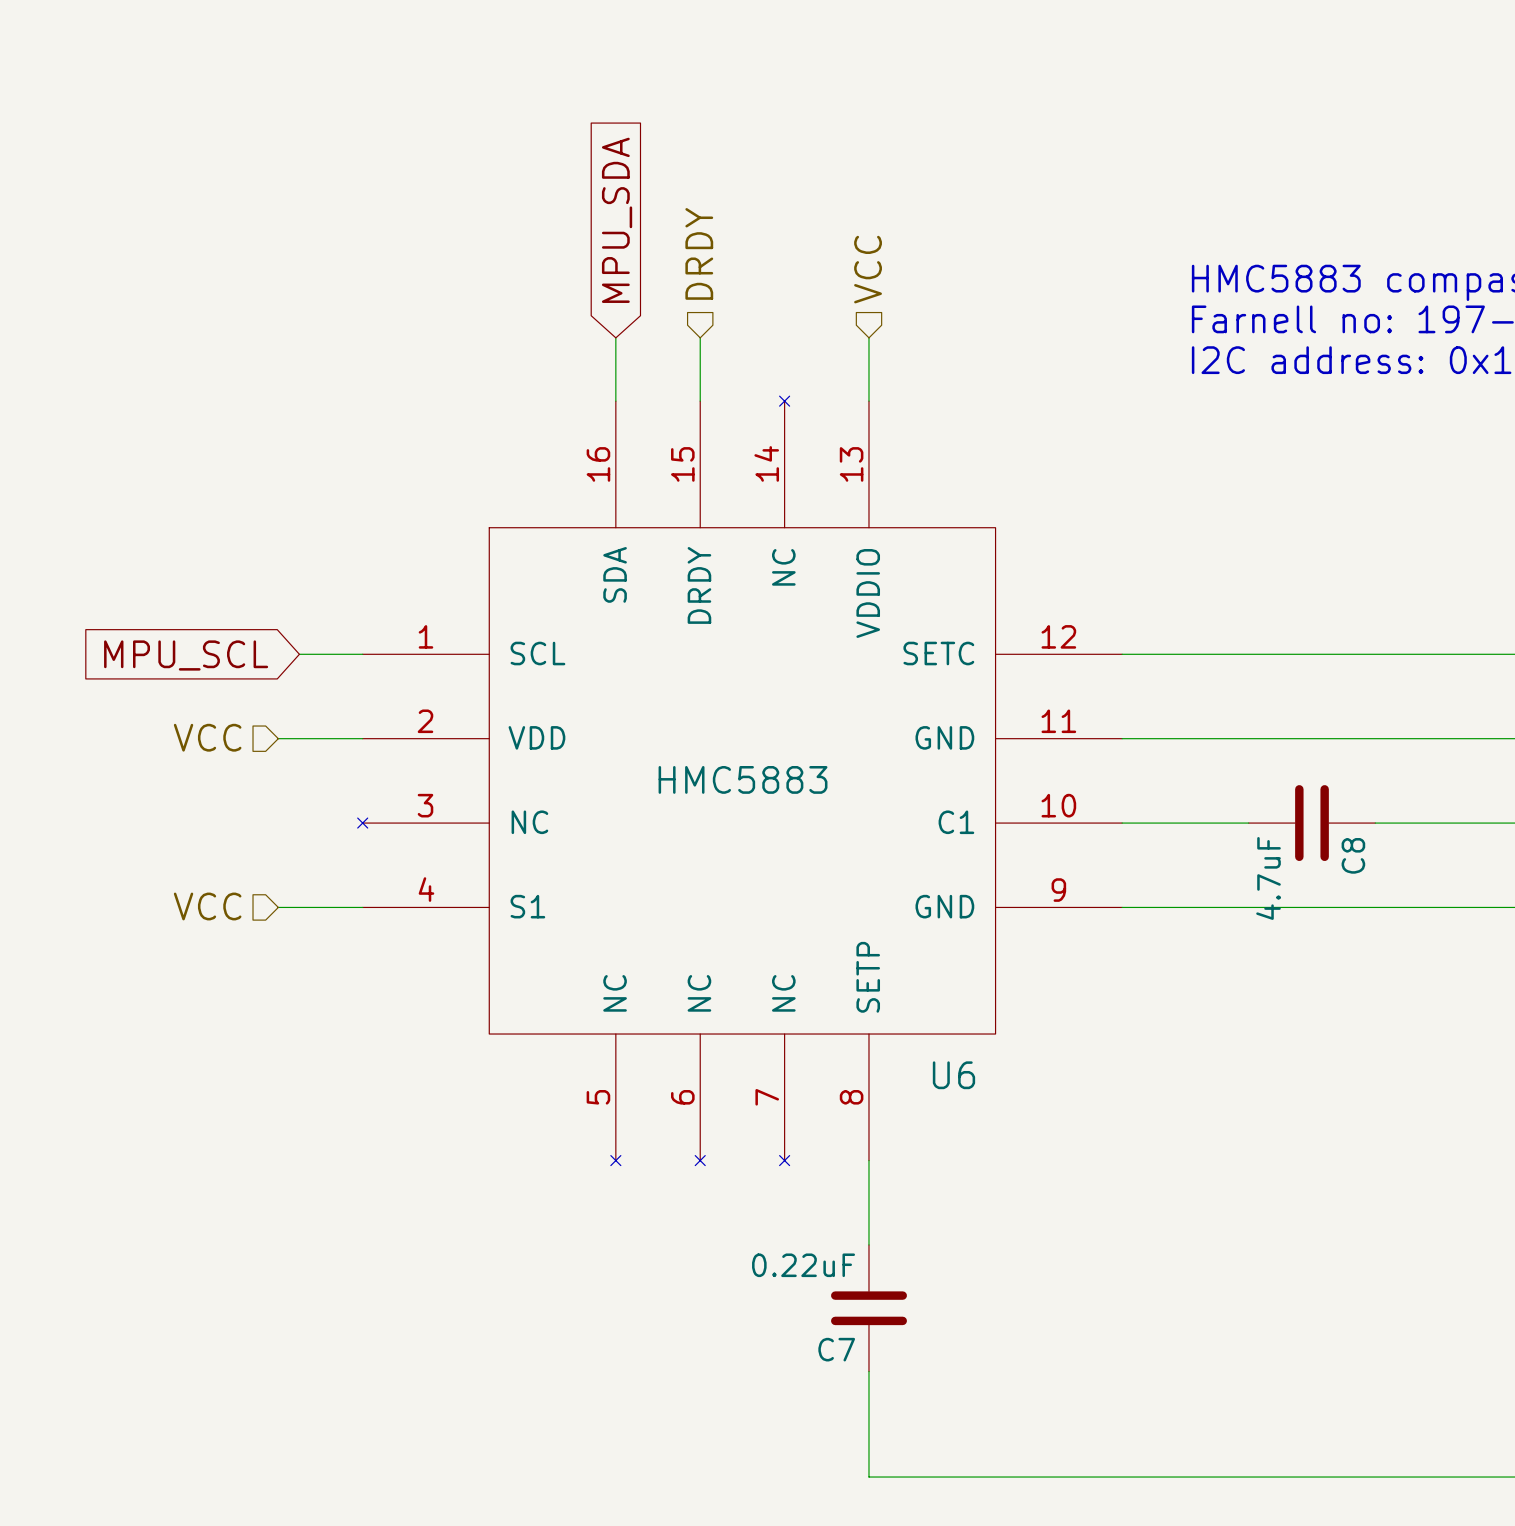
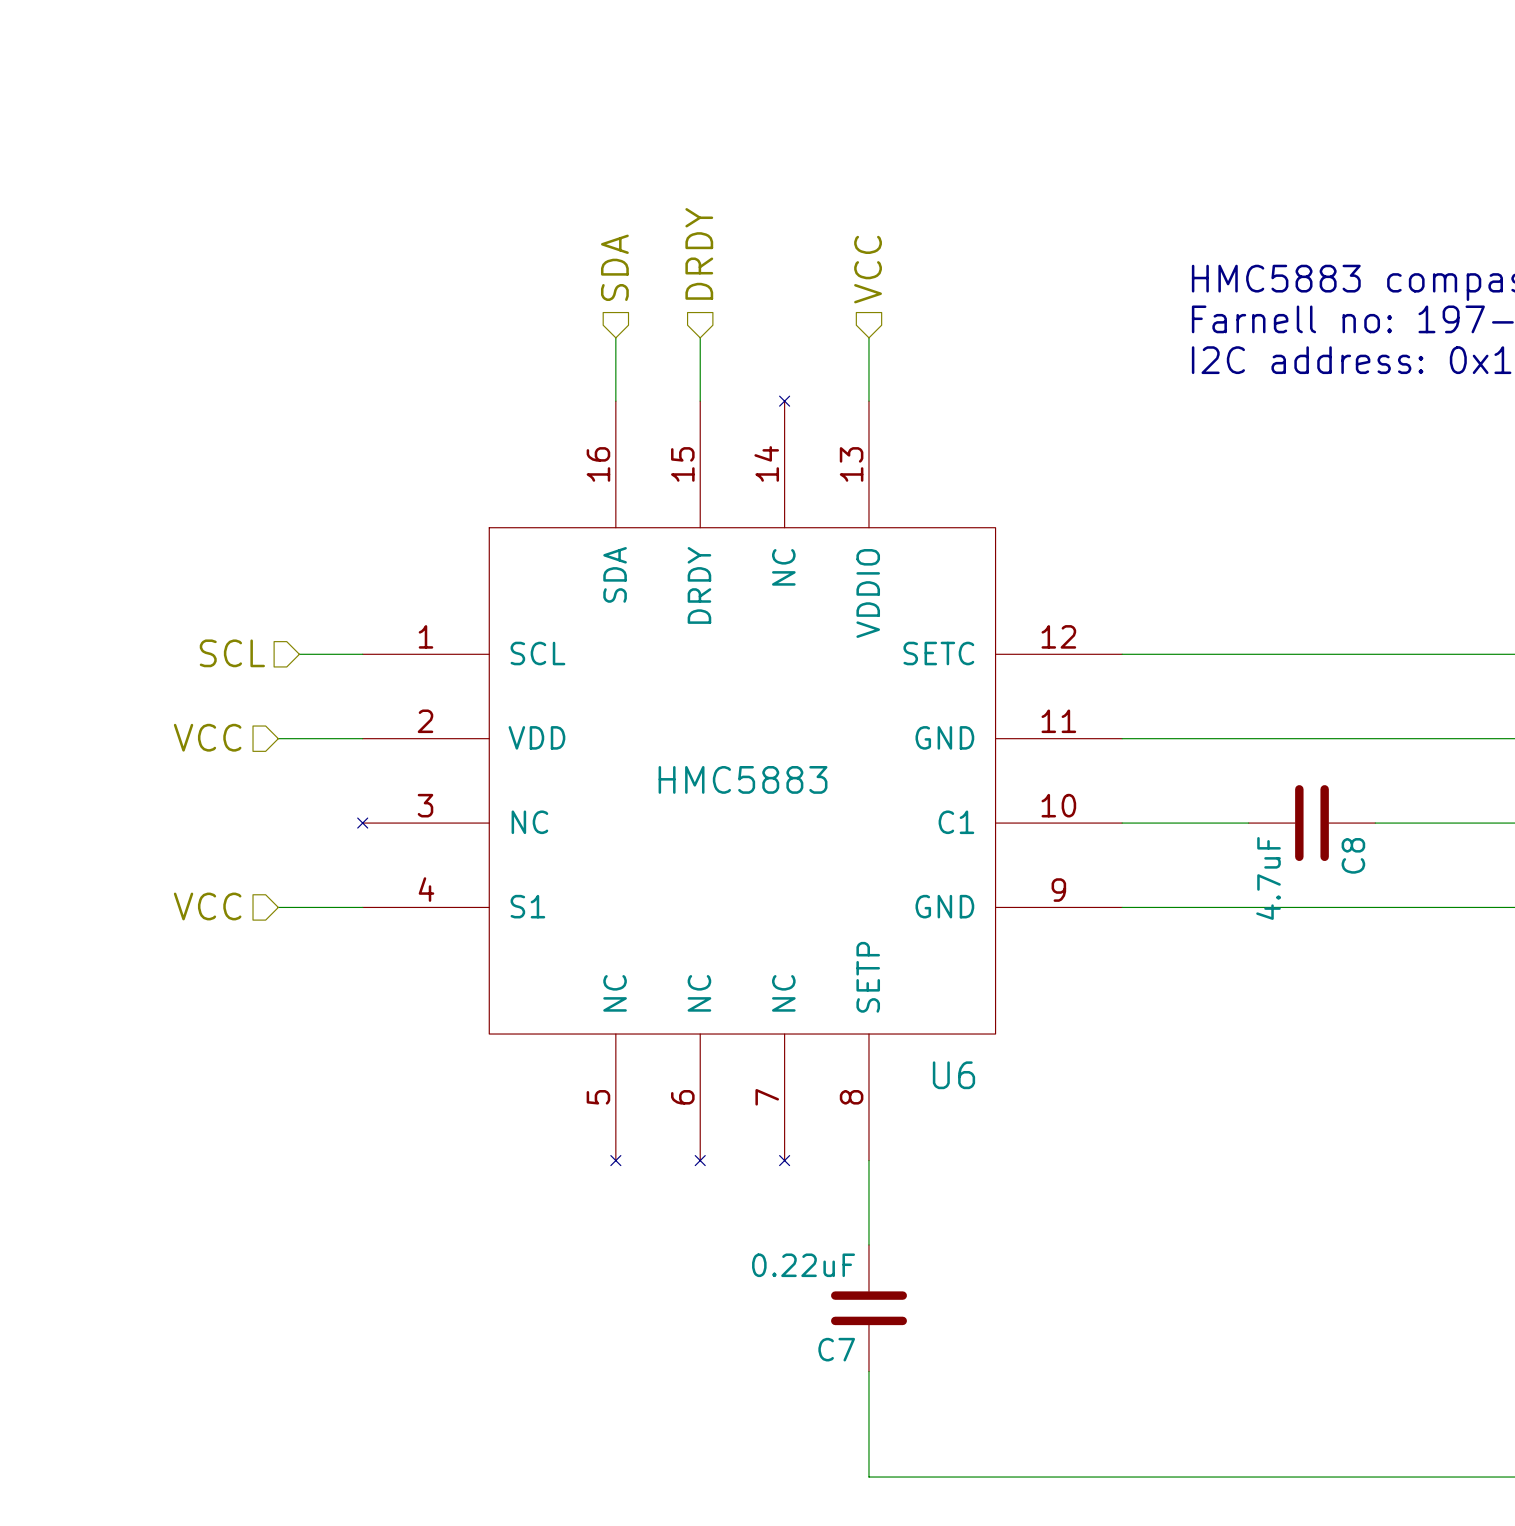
global label: MPU_SDA (617, 220) -> none
hierarchical label: none -> SDA (614, 267)
hierarchical label: none -> SCL (232, 653)
global label: MPU_SCL (186, 655) -> none

